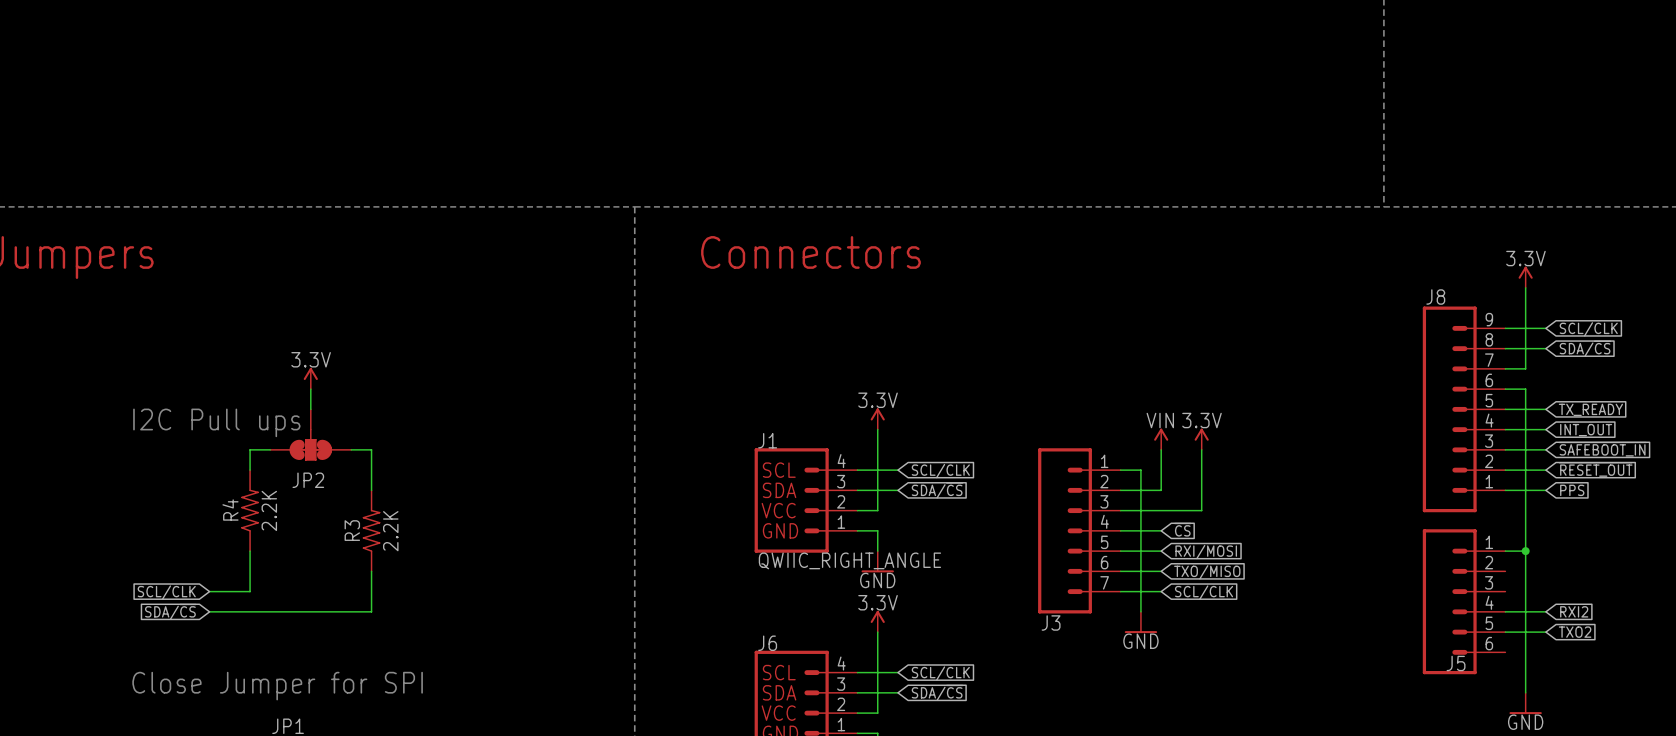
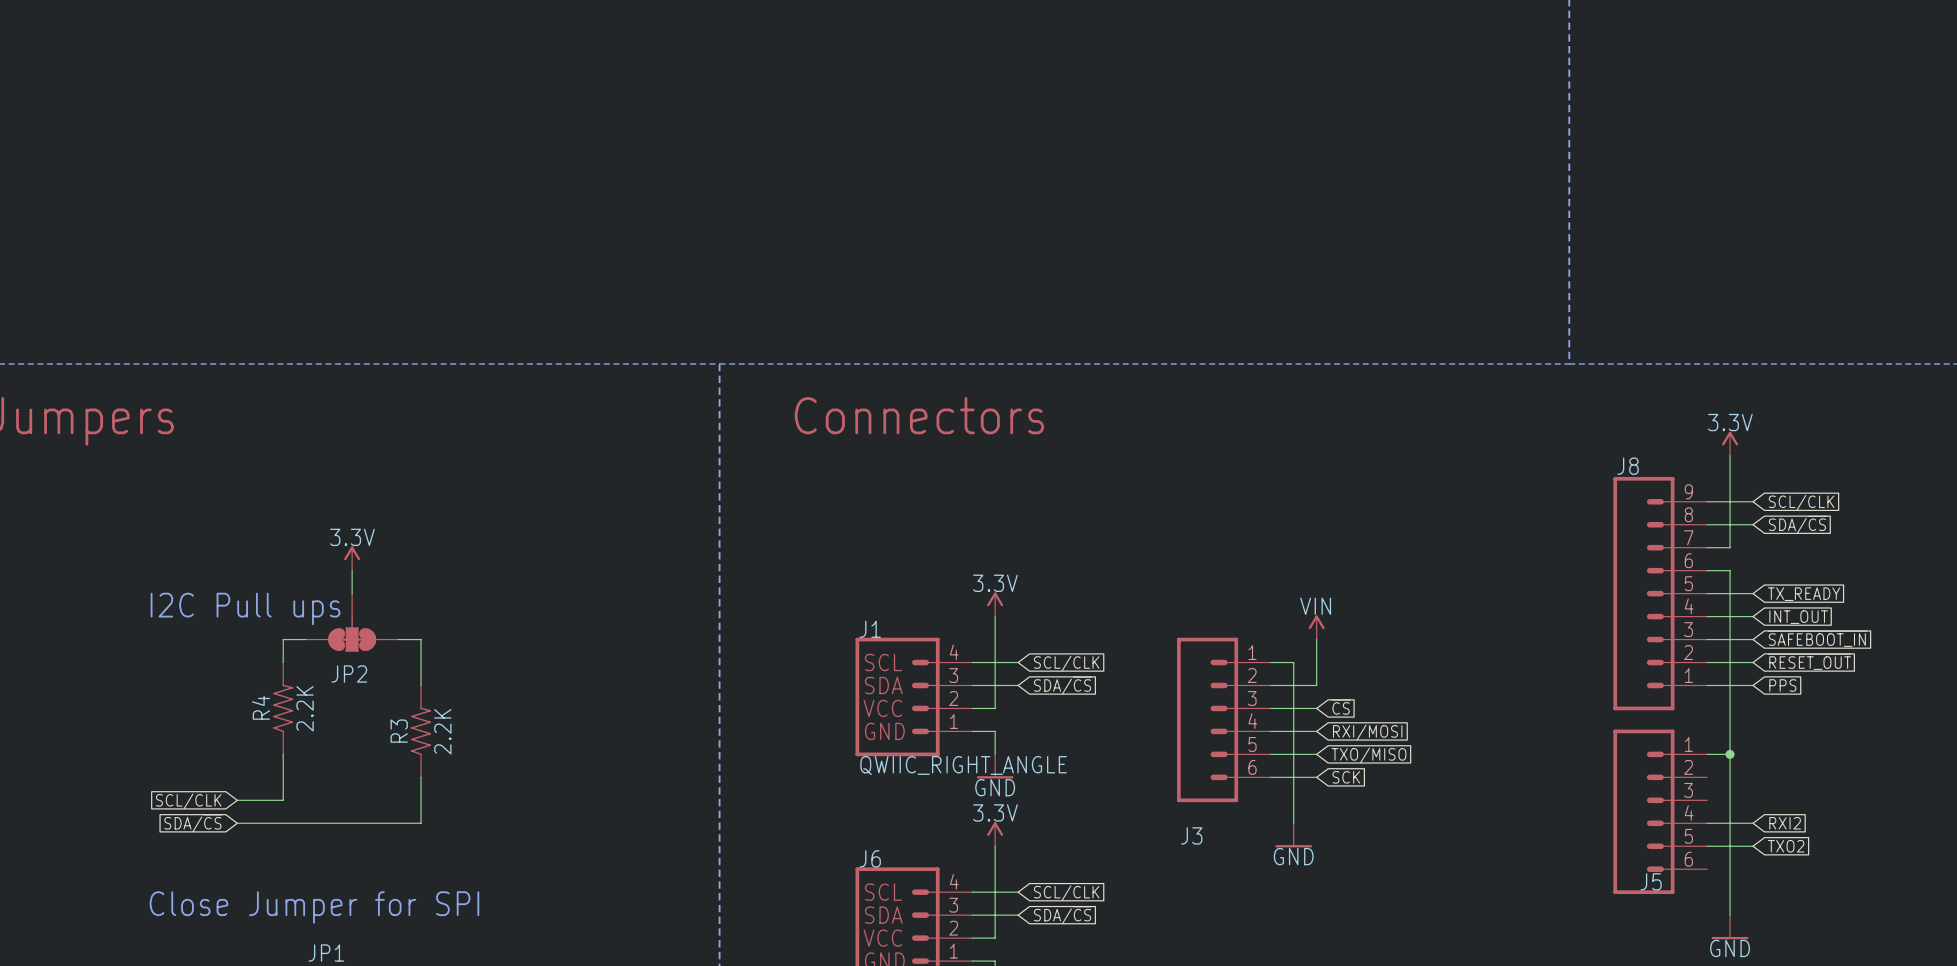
power symbol: 3.3V (1201, 439) -> none
J3 symbol: [1038, 448, 1121, 614] -> [1177, 637, 1271, 803]
wire: (1201, 449) (1201, 510) (1161, 510) -> none
global label: none -> ~{CS} (1341, 707)
global label: ~{CS} (1182, 529) -> RXI/MOSI (1367, 732)
global label: RXI/MOSI (1206, 552) -> TXO/MISO (1368, 755)
global label: TXO/MISO (1207, 572) -> SCK (1346, 777)
wire: (1120, 591) (1161, 591) -> none
global label: SCL/CLK (1204, 592) -> none

